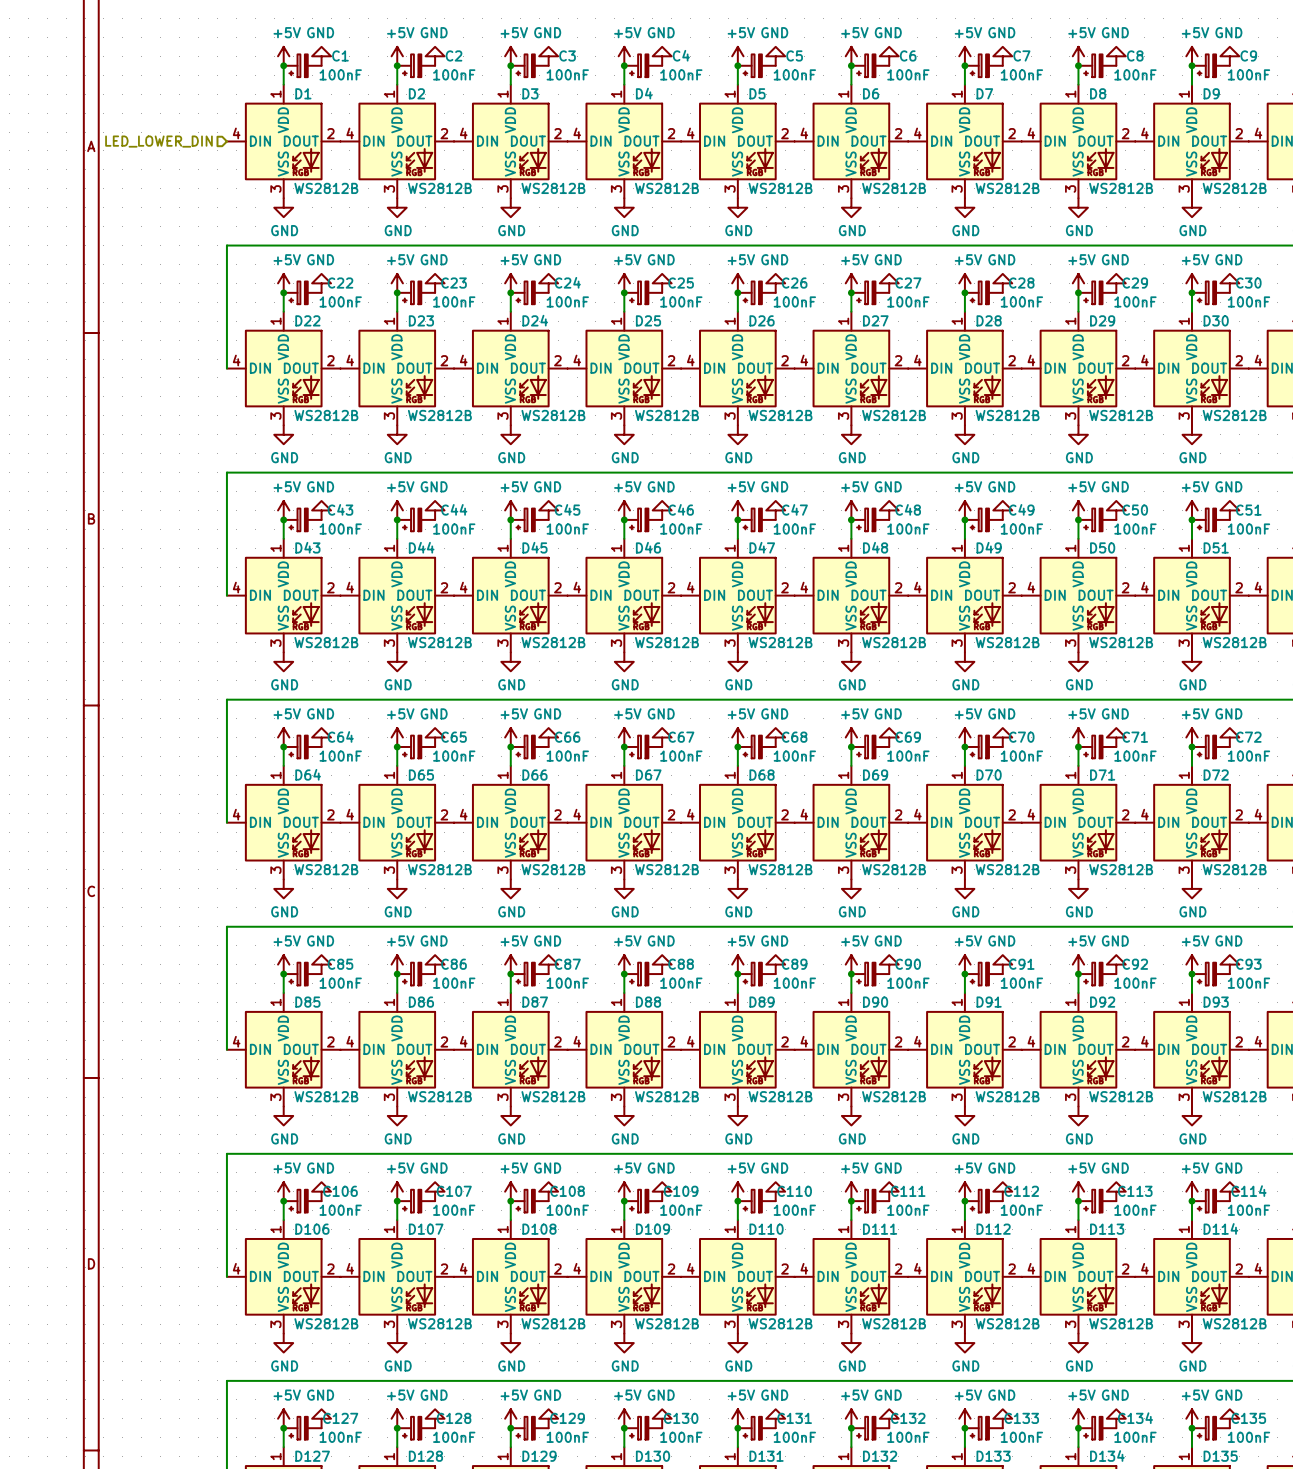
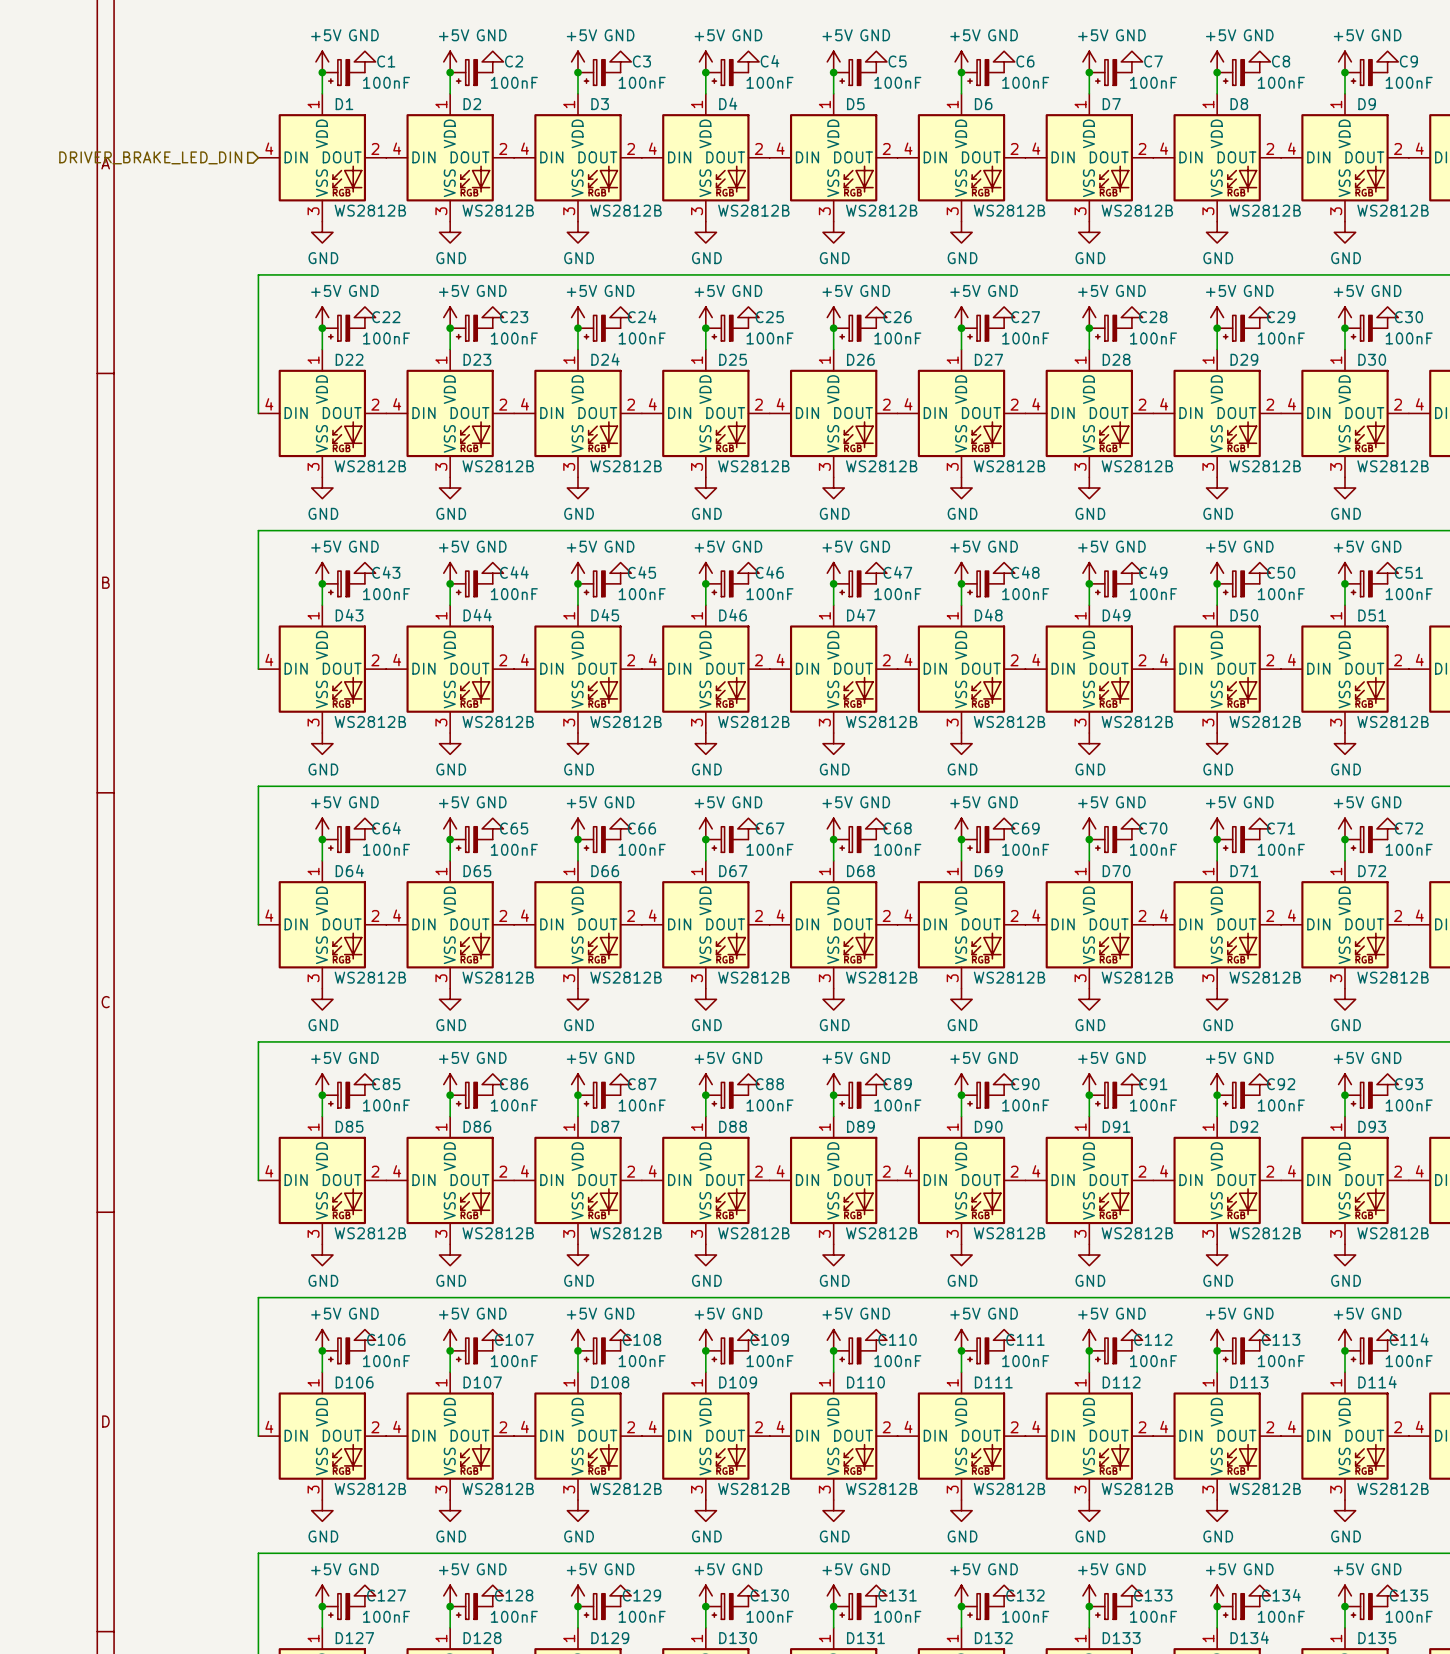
hierarchical label: LED_LOWER_DIN (158, 141) -> DRIVER_BRAKE_LED_DIN (150, 157)

